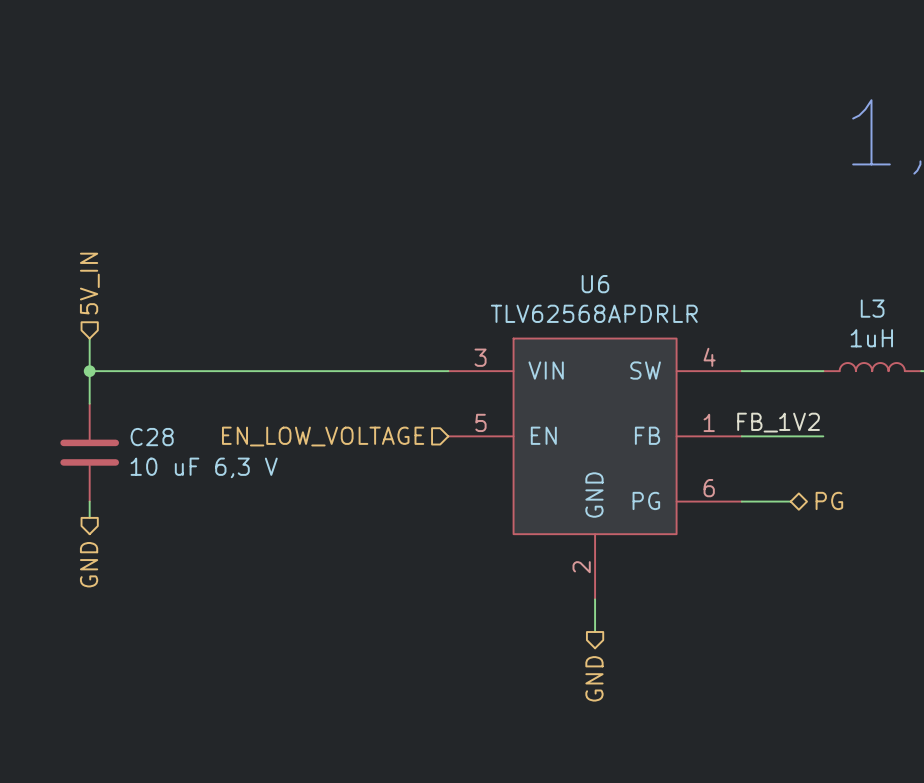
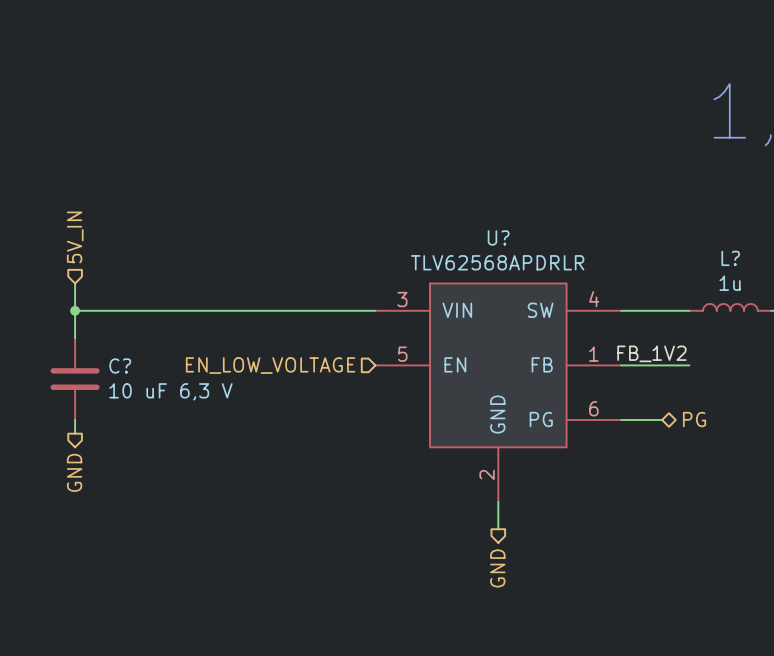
U6 name: U6 (595, 284) -> U? (498, 237)
L3 name: L3 (872, 308) -> L? (730, 258)
L3 value: 1uH (871, 338) -> 1u (730, 283)
C28 name: C28 (152, 437) -> C? (120, 365)

